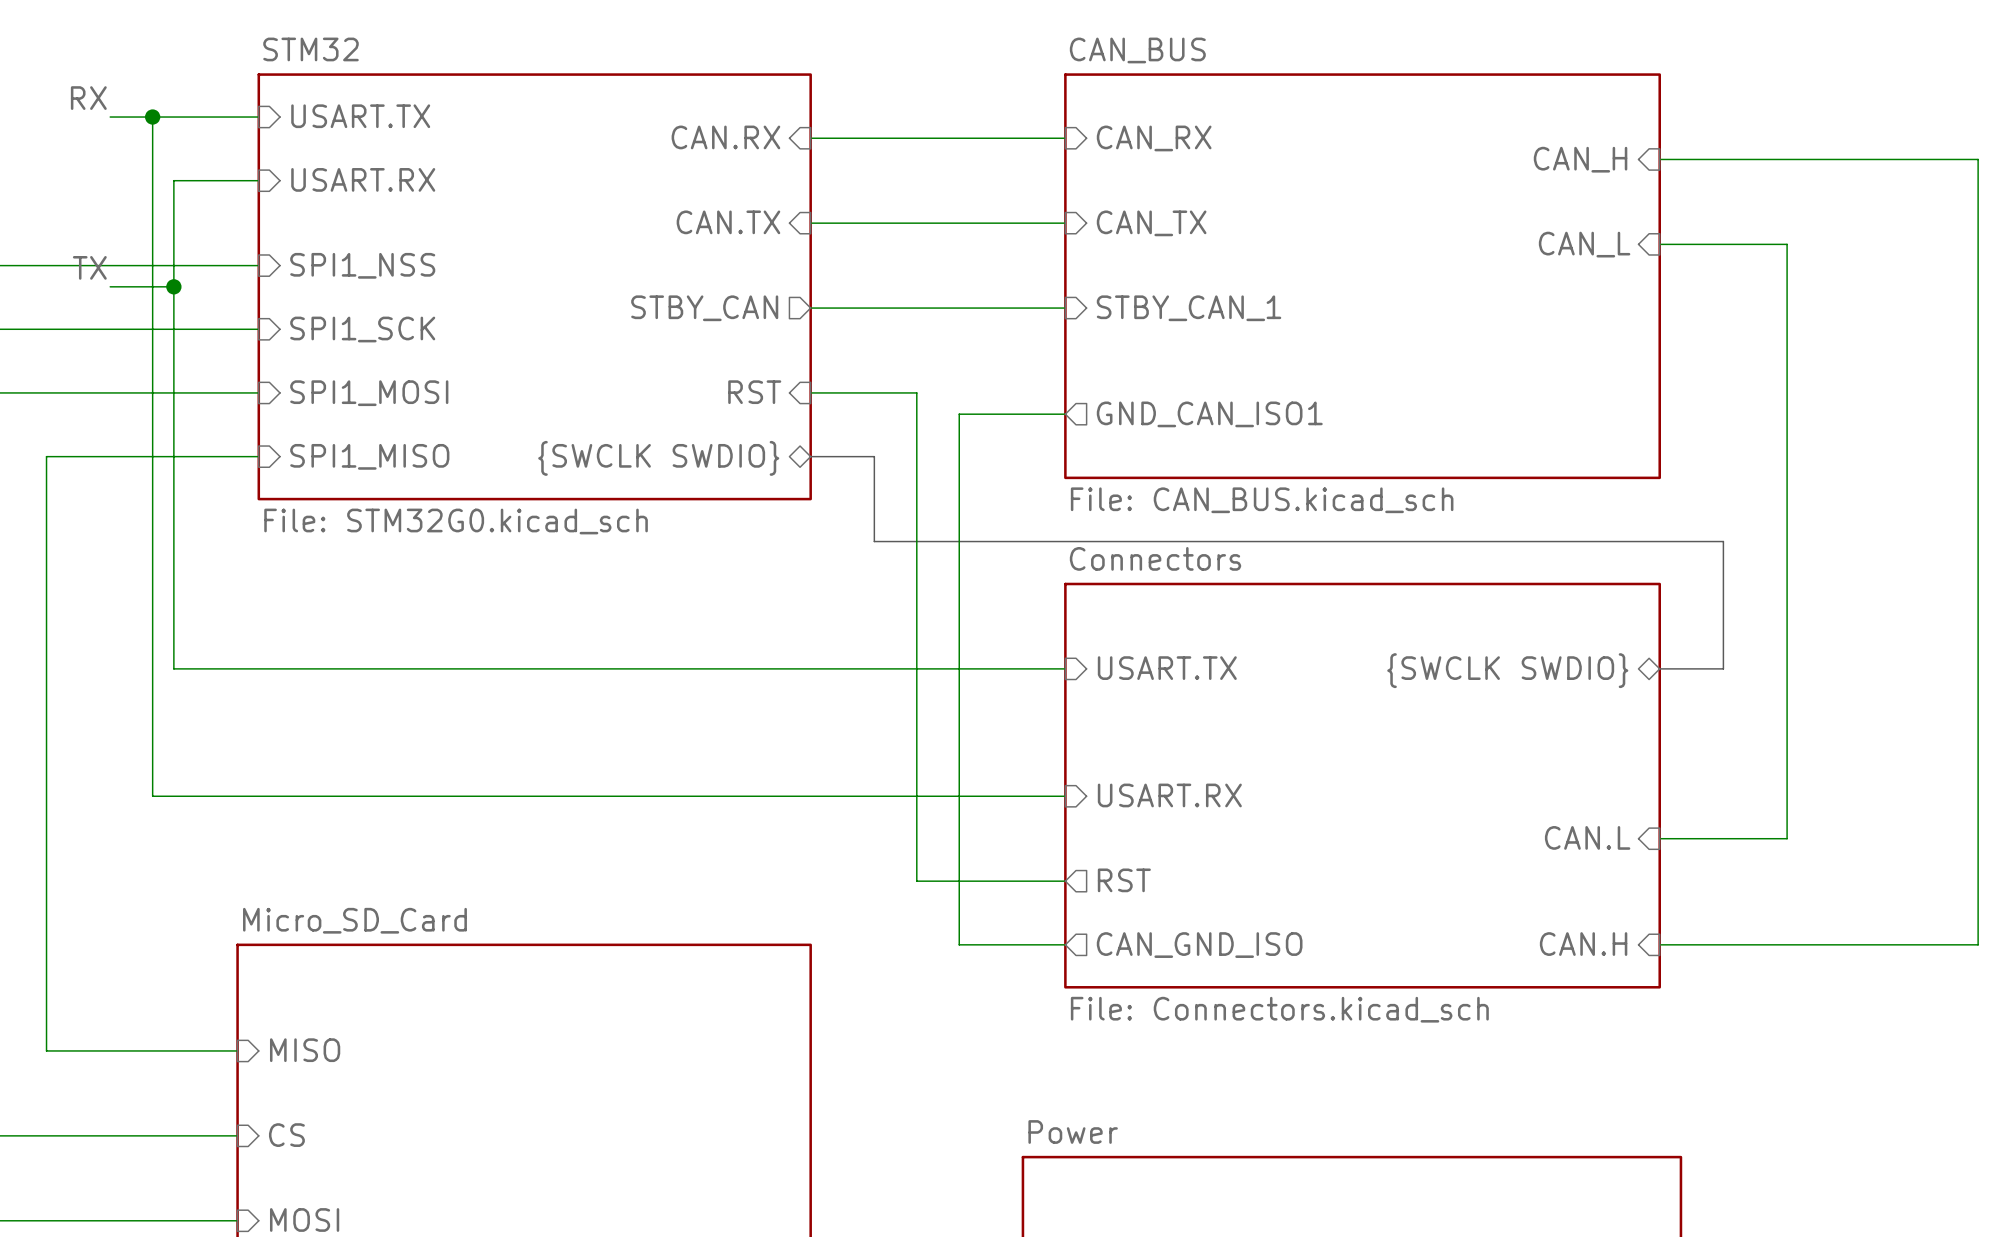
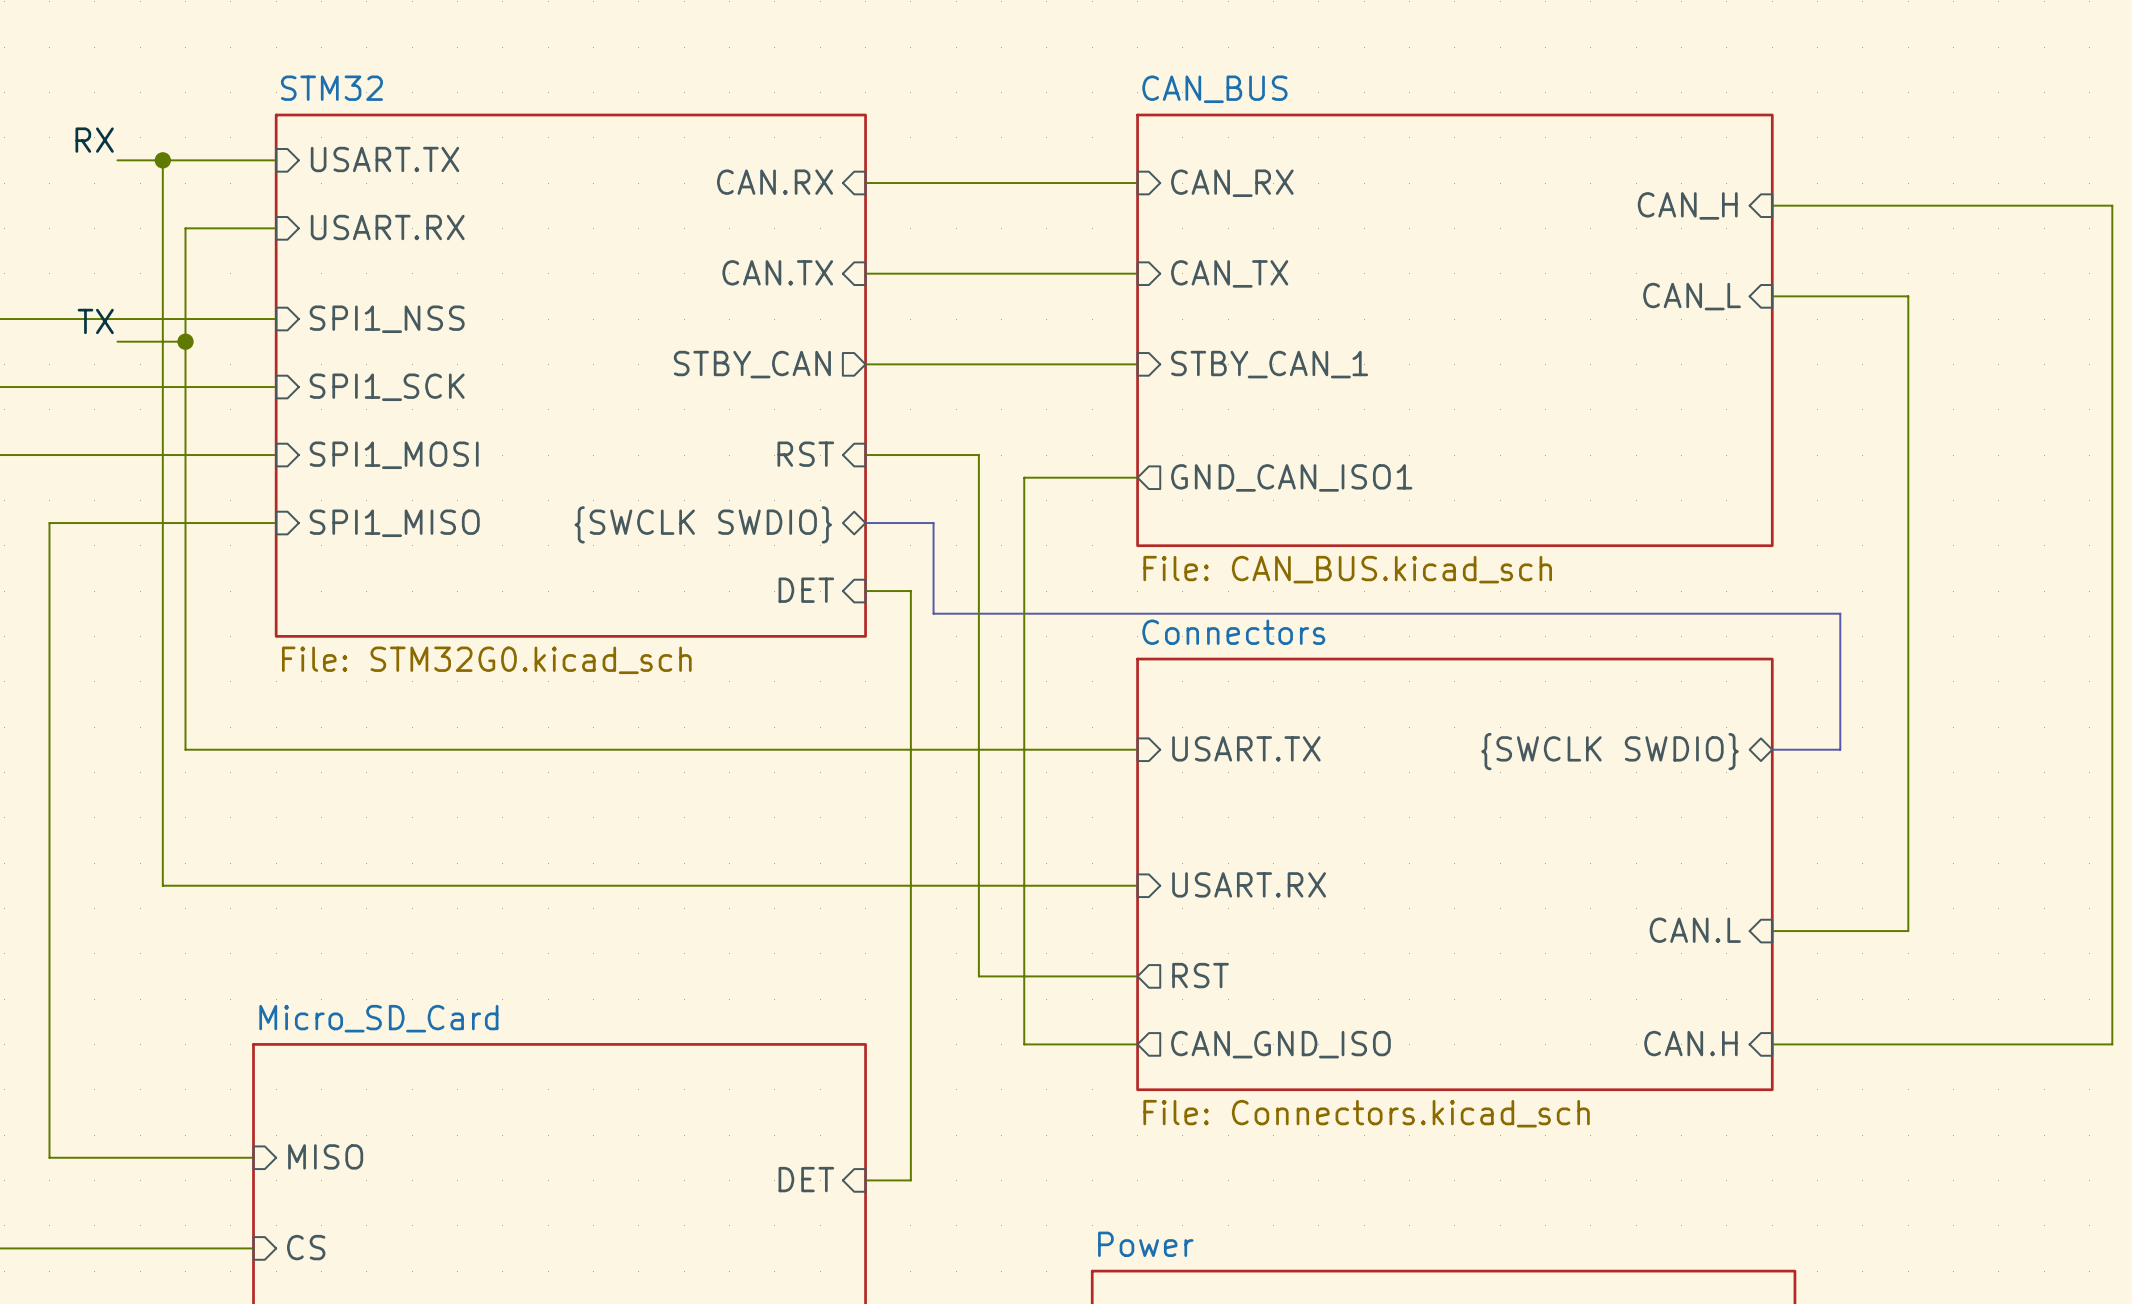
sheet STM32 shape: [257, 73, 812, 501] -> [274, 113, 867, 638]
sheet pin: none -> DET (806, 590)
wire: none -> (865, 591) (910, 591) (910, 1180) (865, 1180)
sheet pin: none -> DET (806, 1179)

